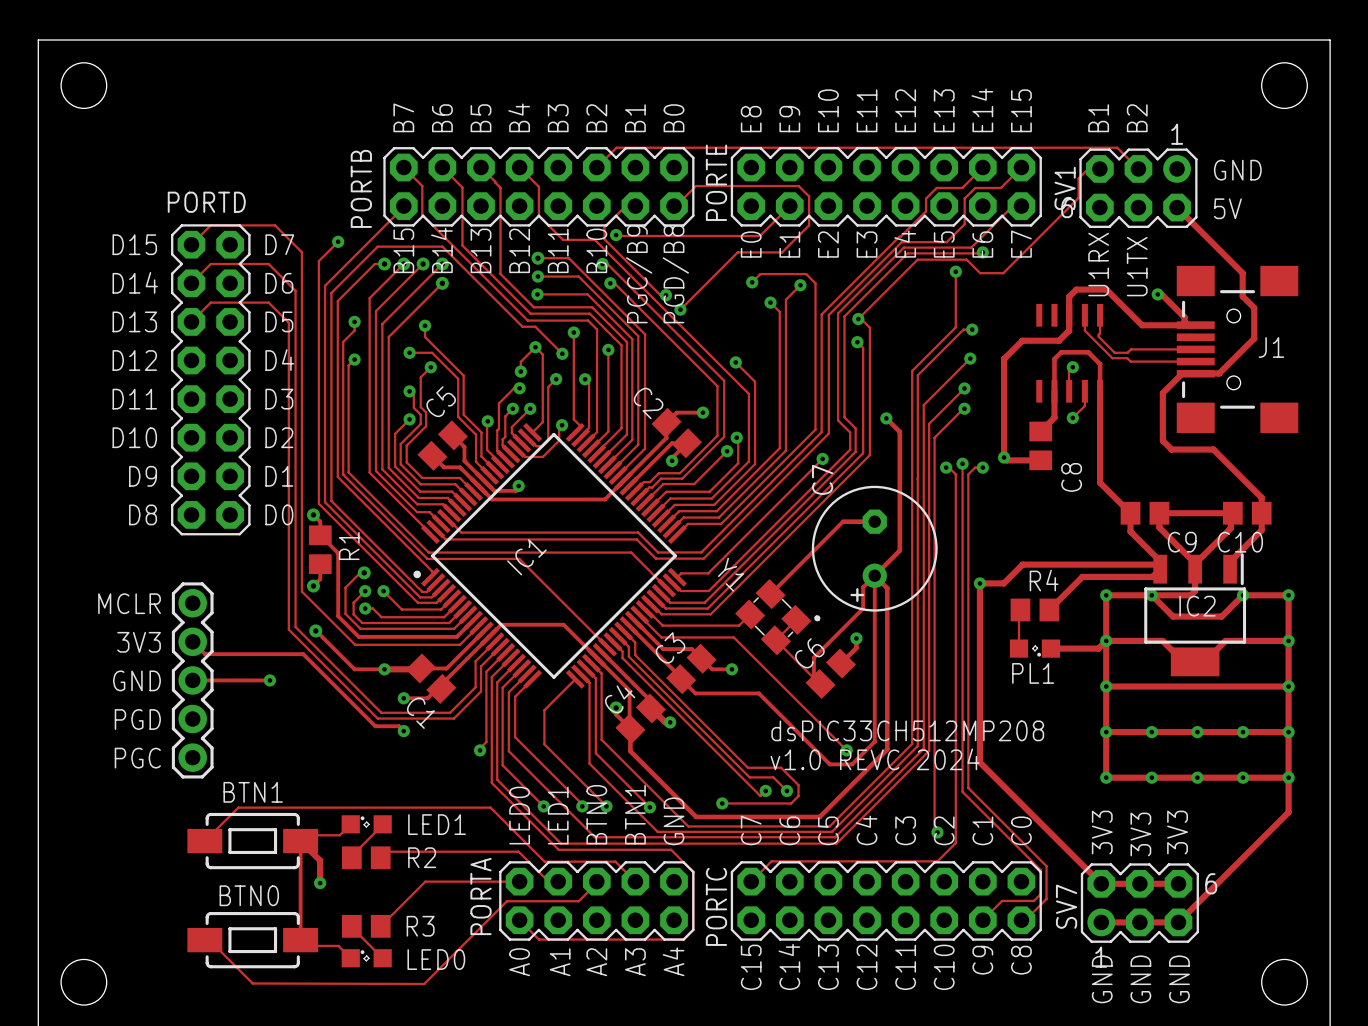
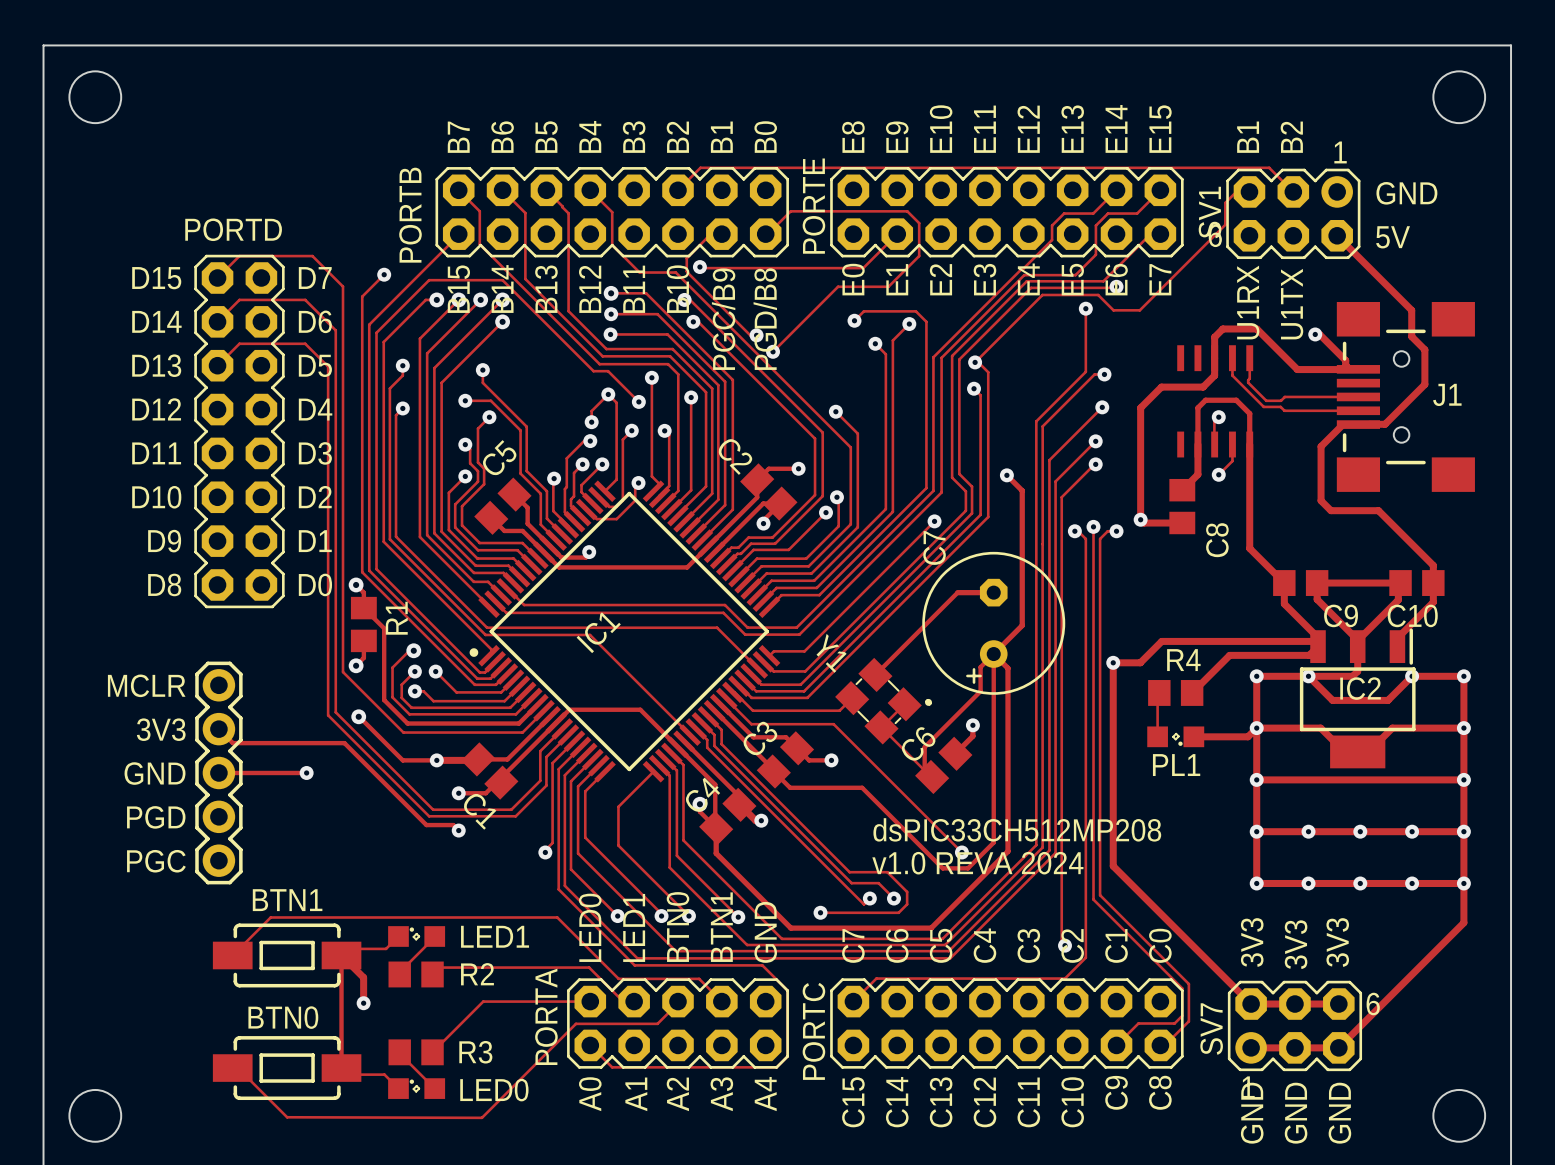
text: v1.0 REVC 2024 (875, 759) -> v1.0 REVA 2024 (977, 863)

